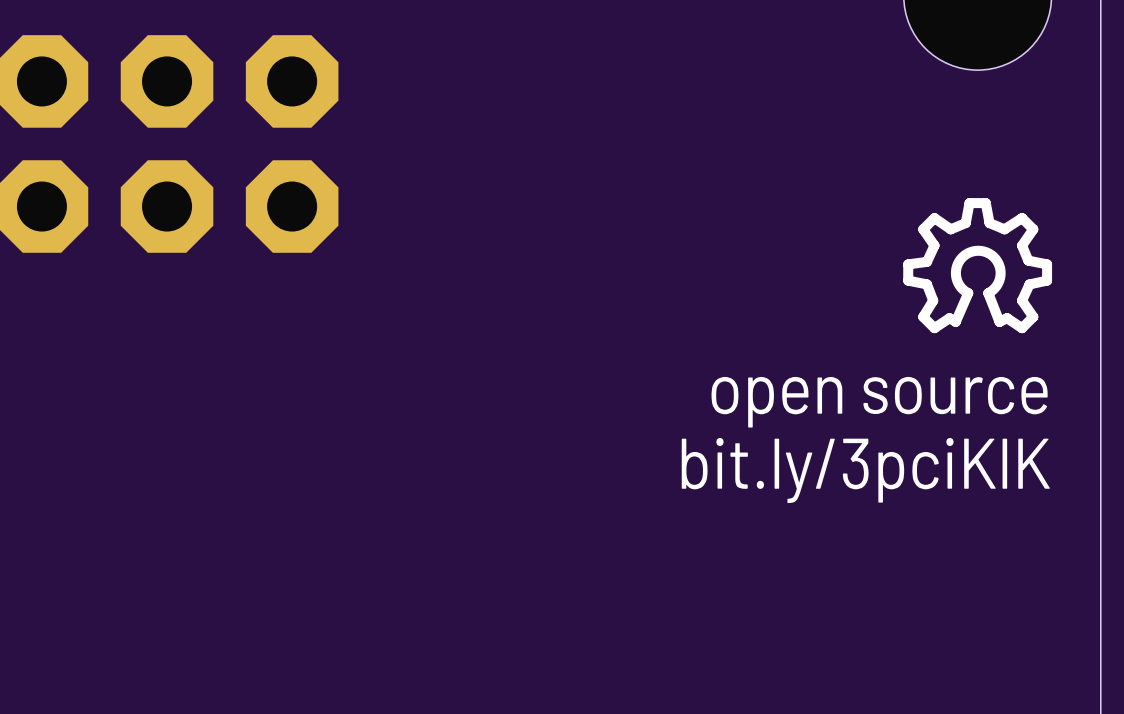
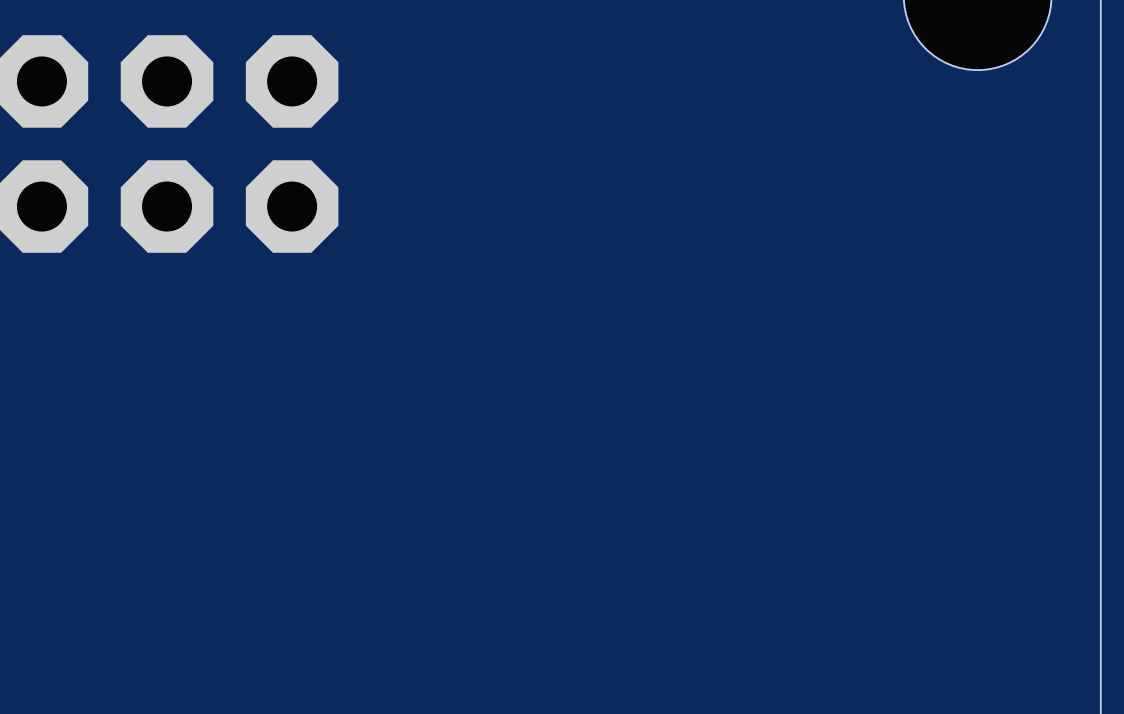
drawing: [903, 198, 1053, 334] -> none
text: open source (879, 402) -> none
text: bit.ly/3pciKlK (865, 470) -> none

